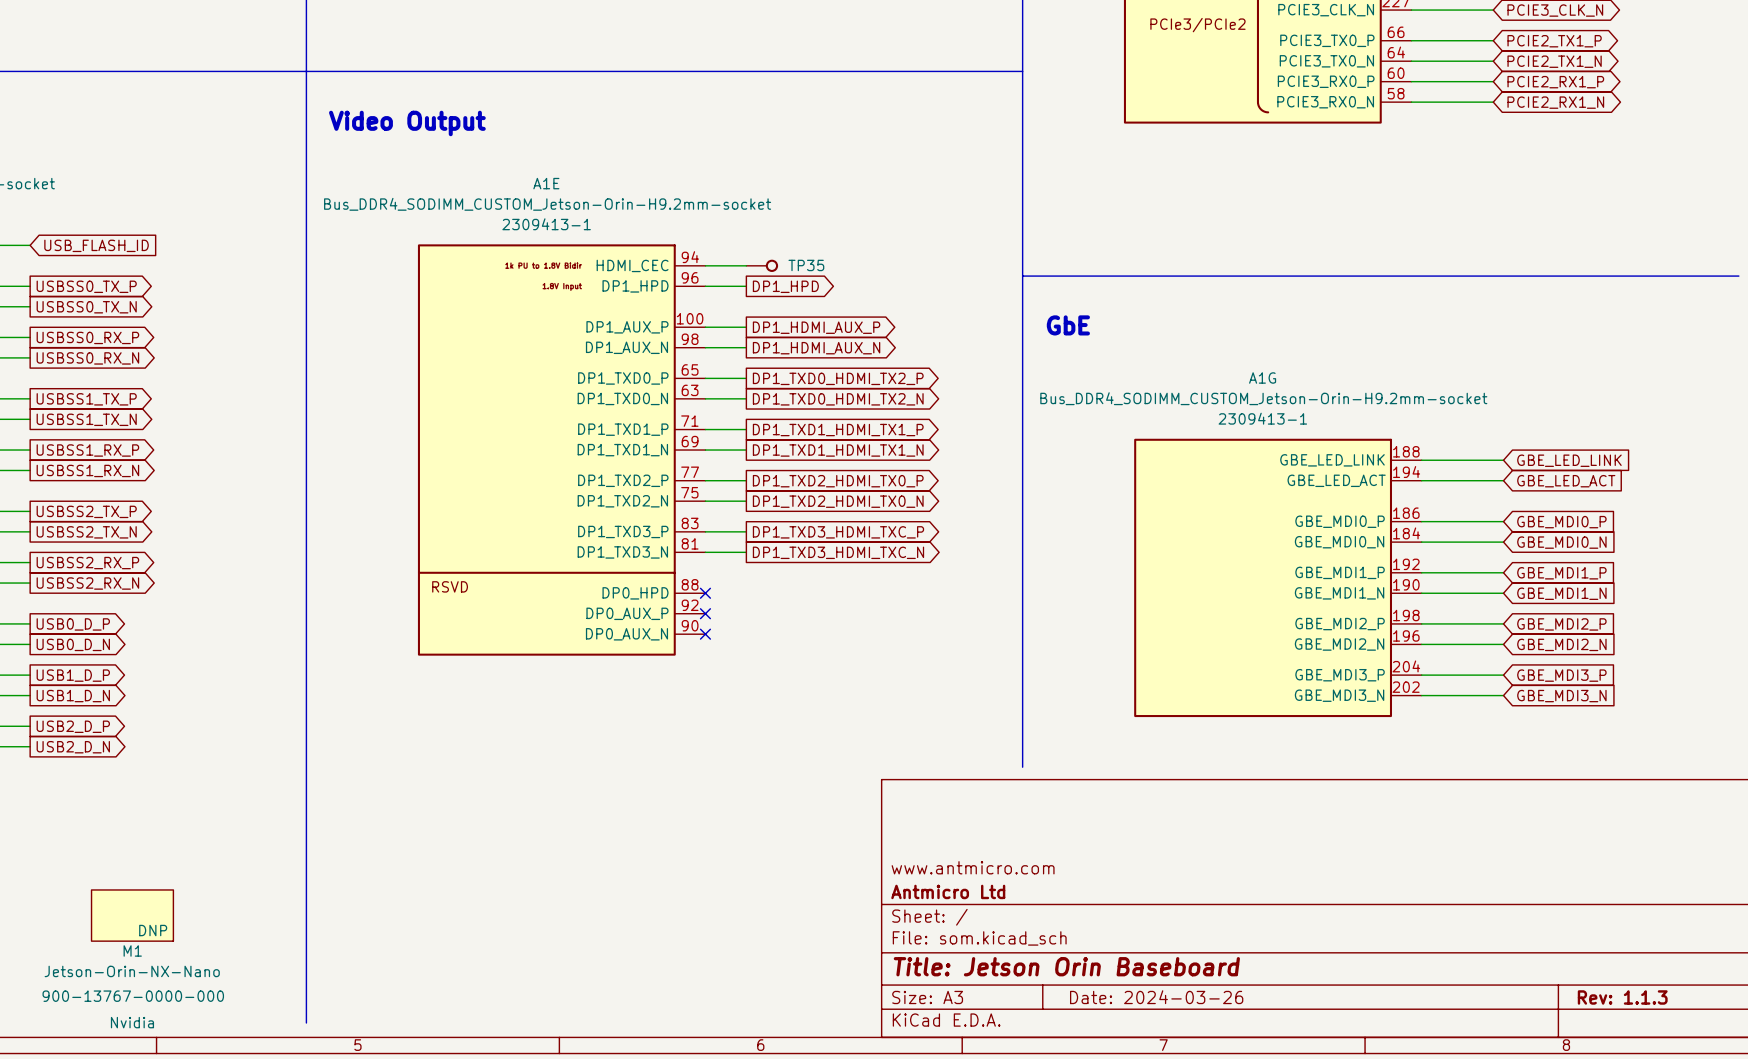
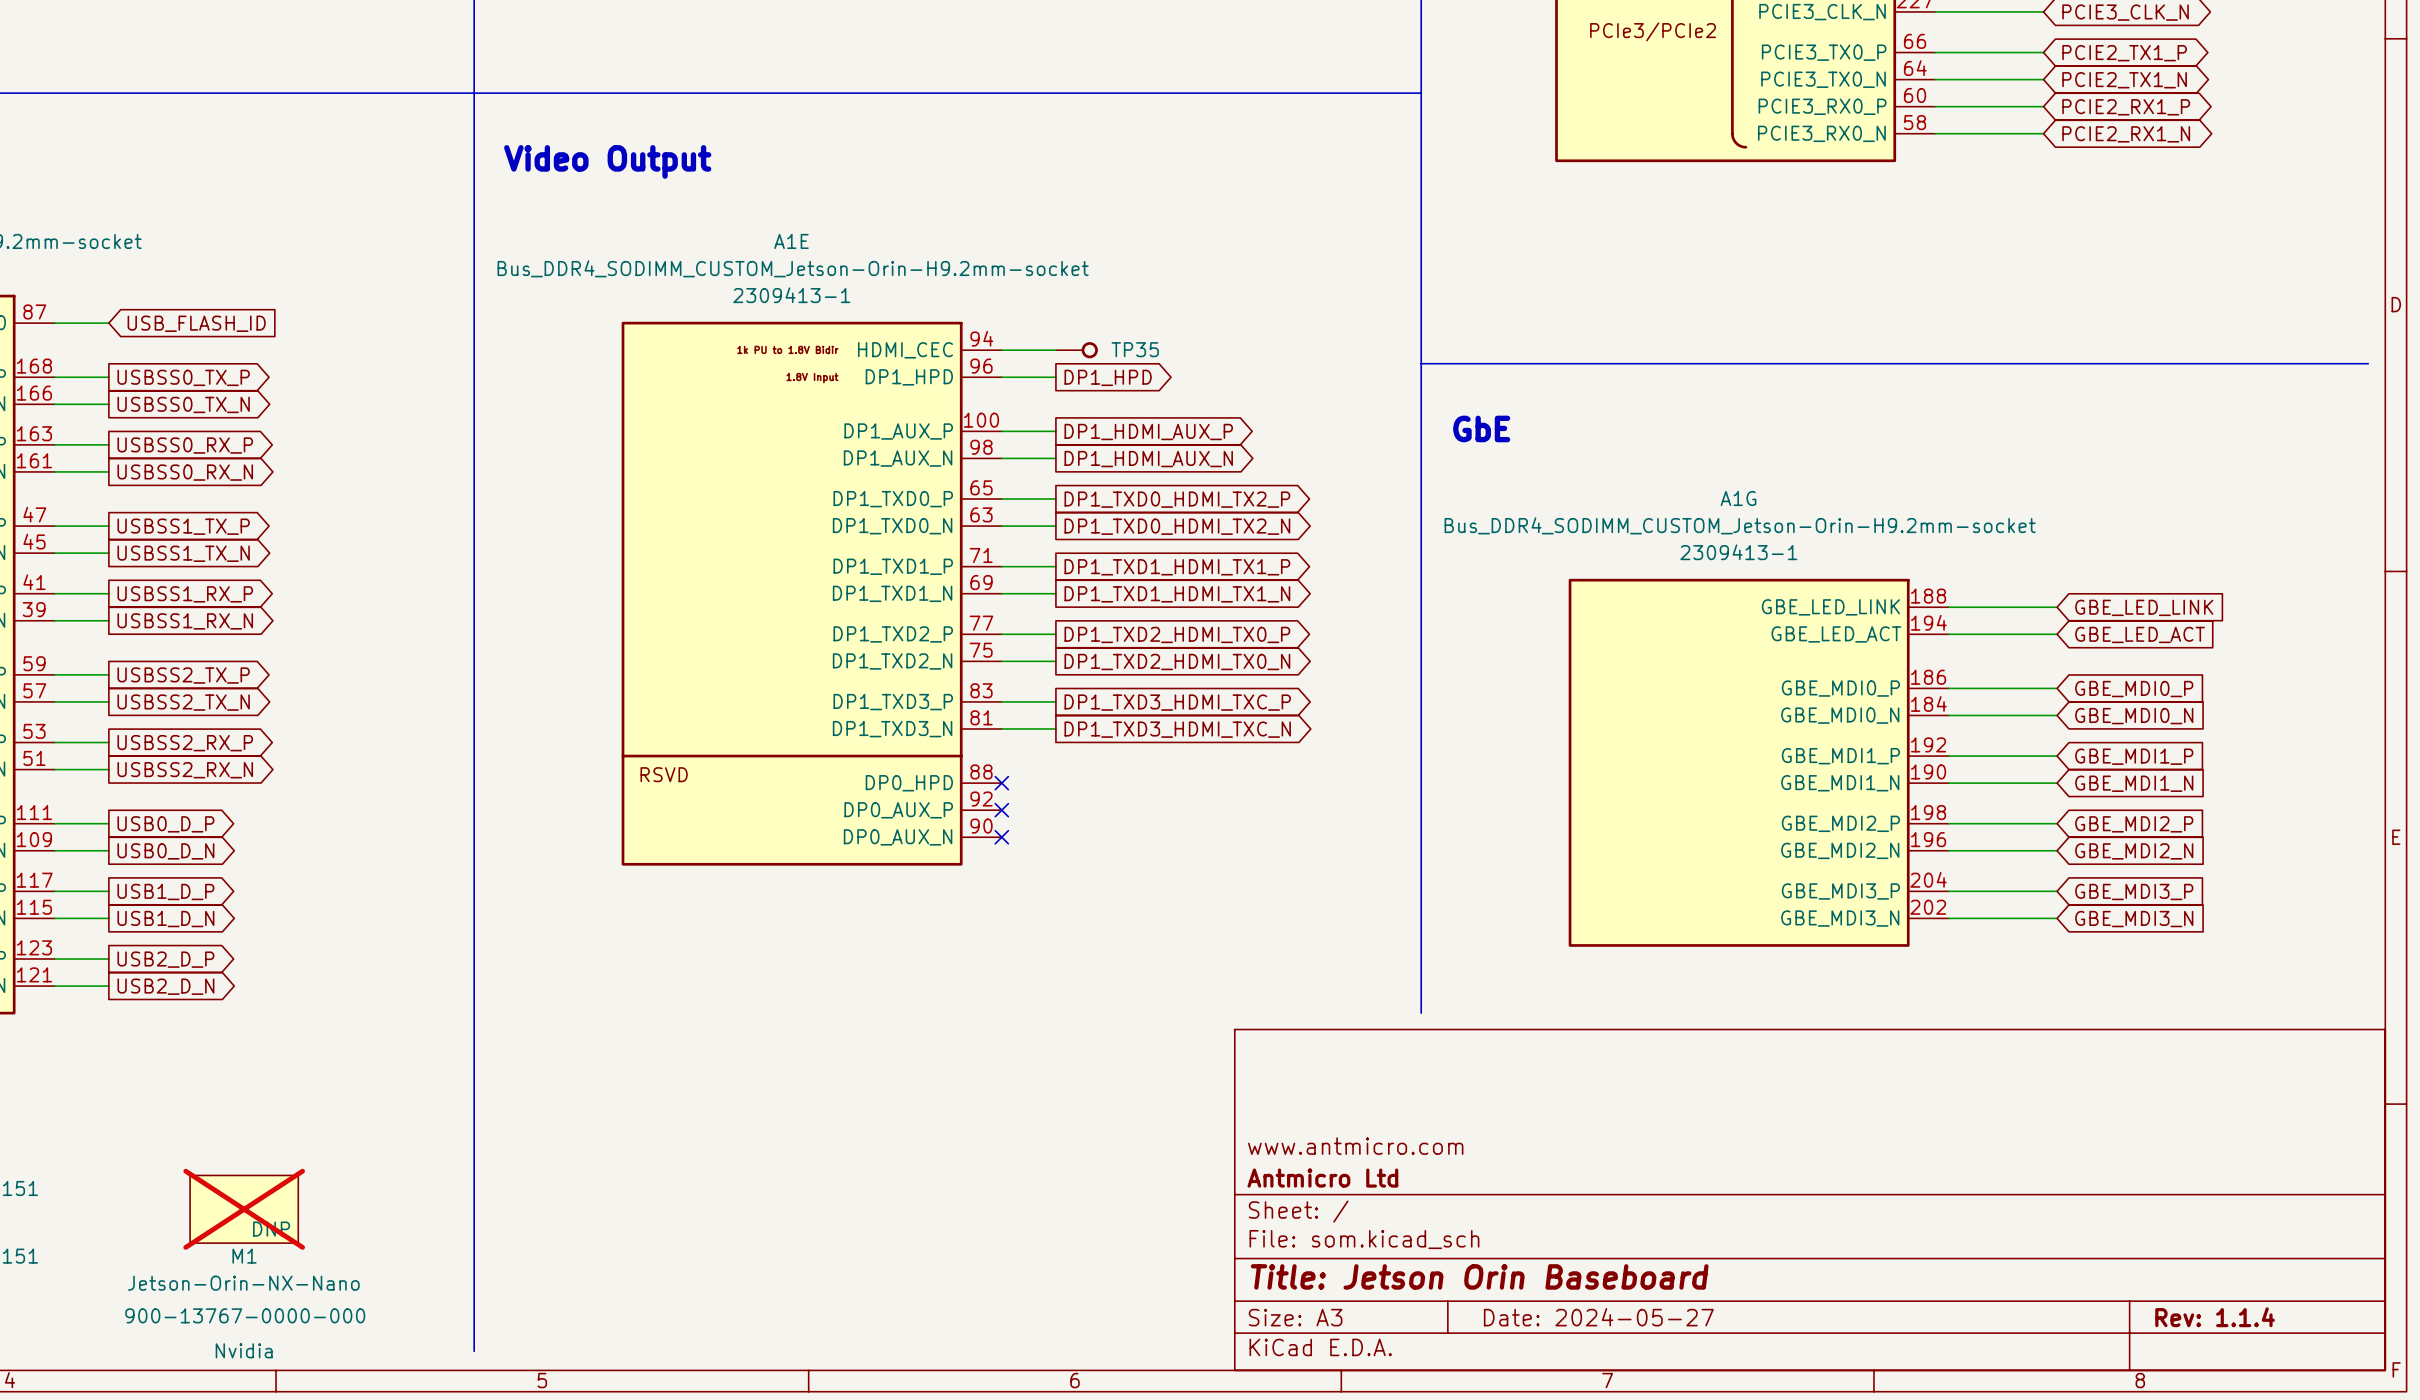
M1 do-not-place cross: none -> (244, 1209)
title block: Date: 2024-03-26 (1156, 997) -> Date: 2024-05-27 (1598, 1317)
title block: Rev: 1.1.3 (1622, 997) -> Rev: 1.1.4 (2215, 1317)

